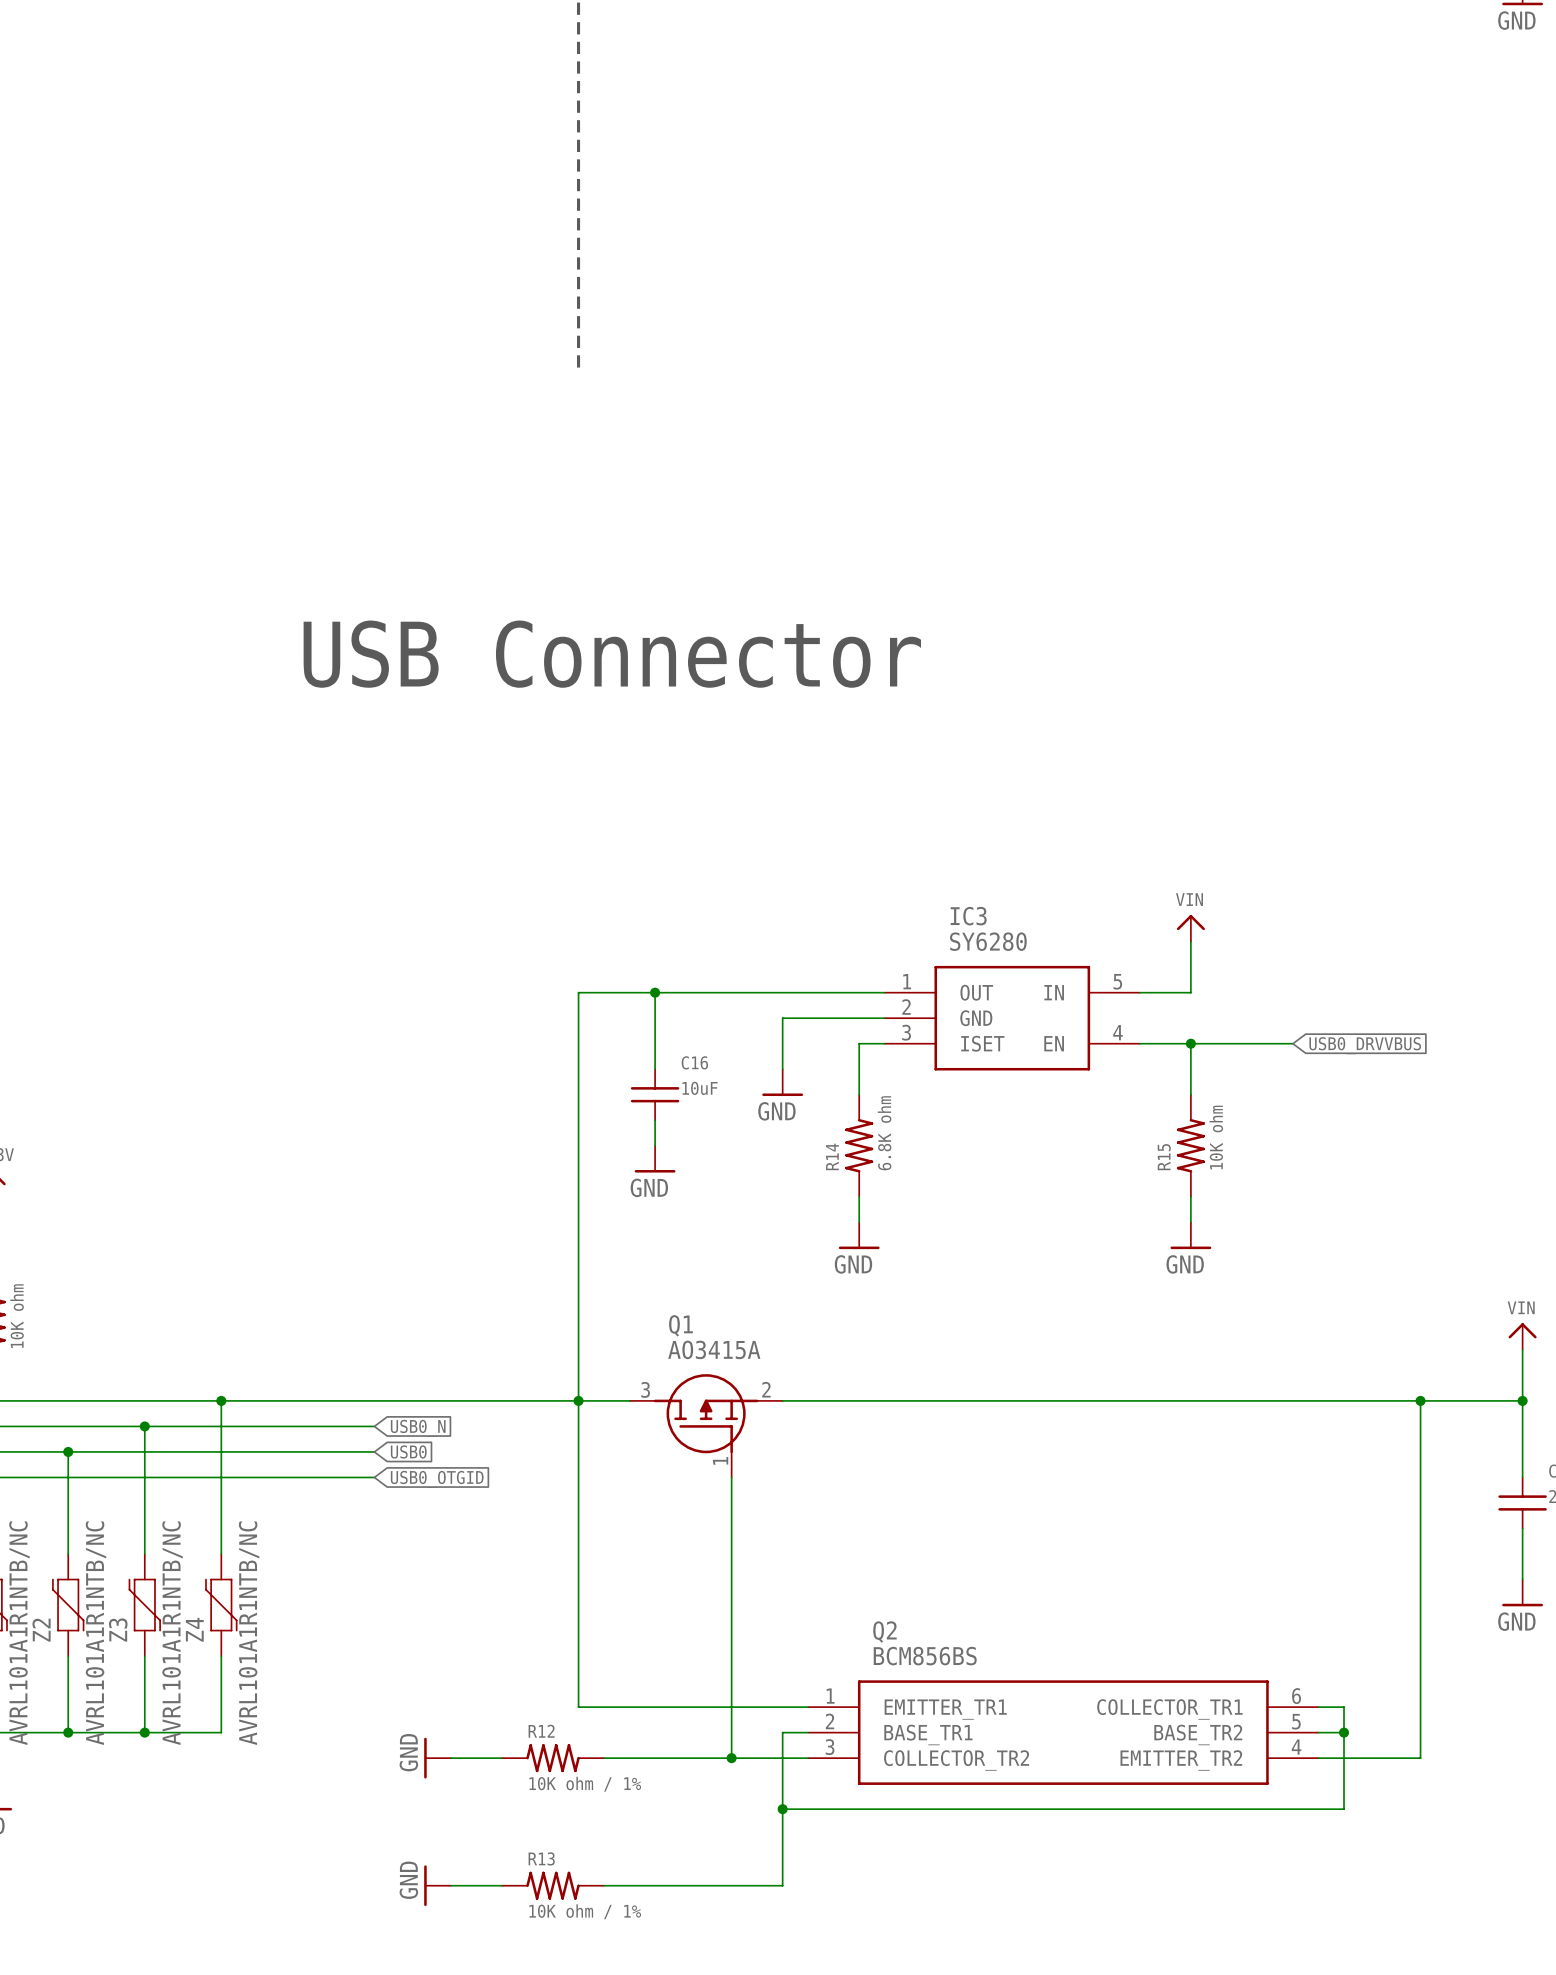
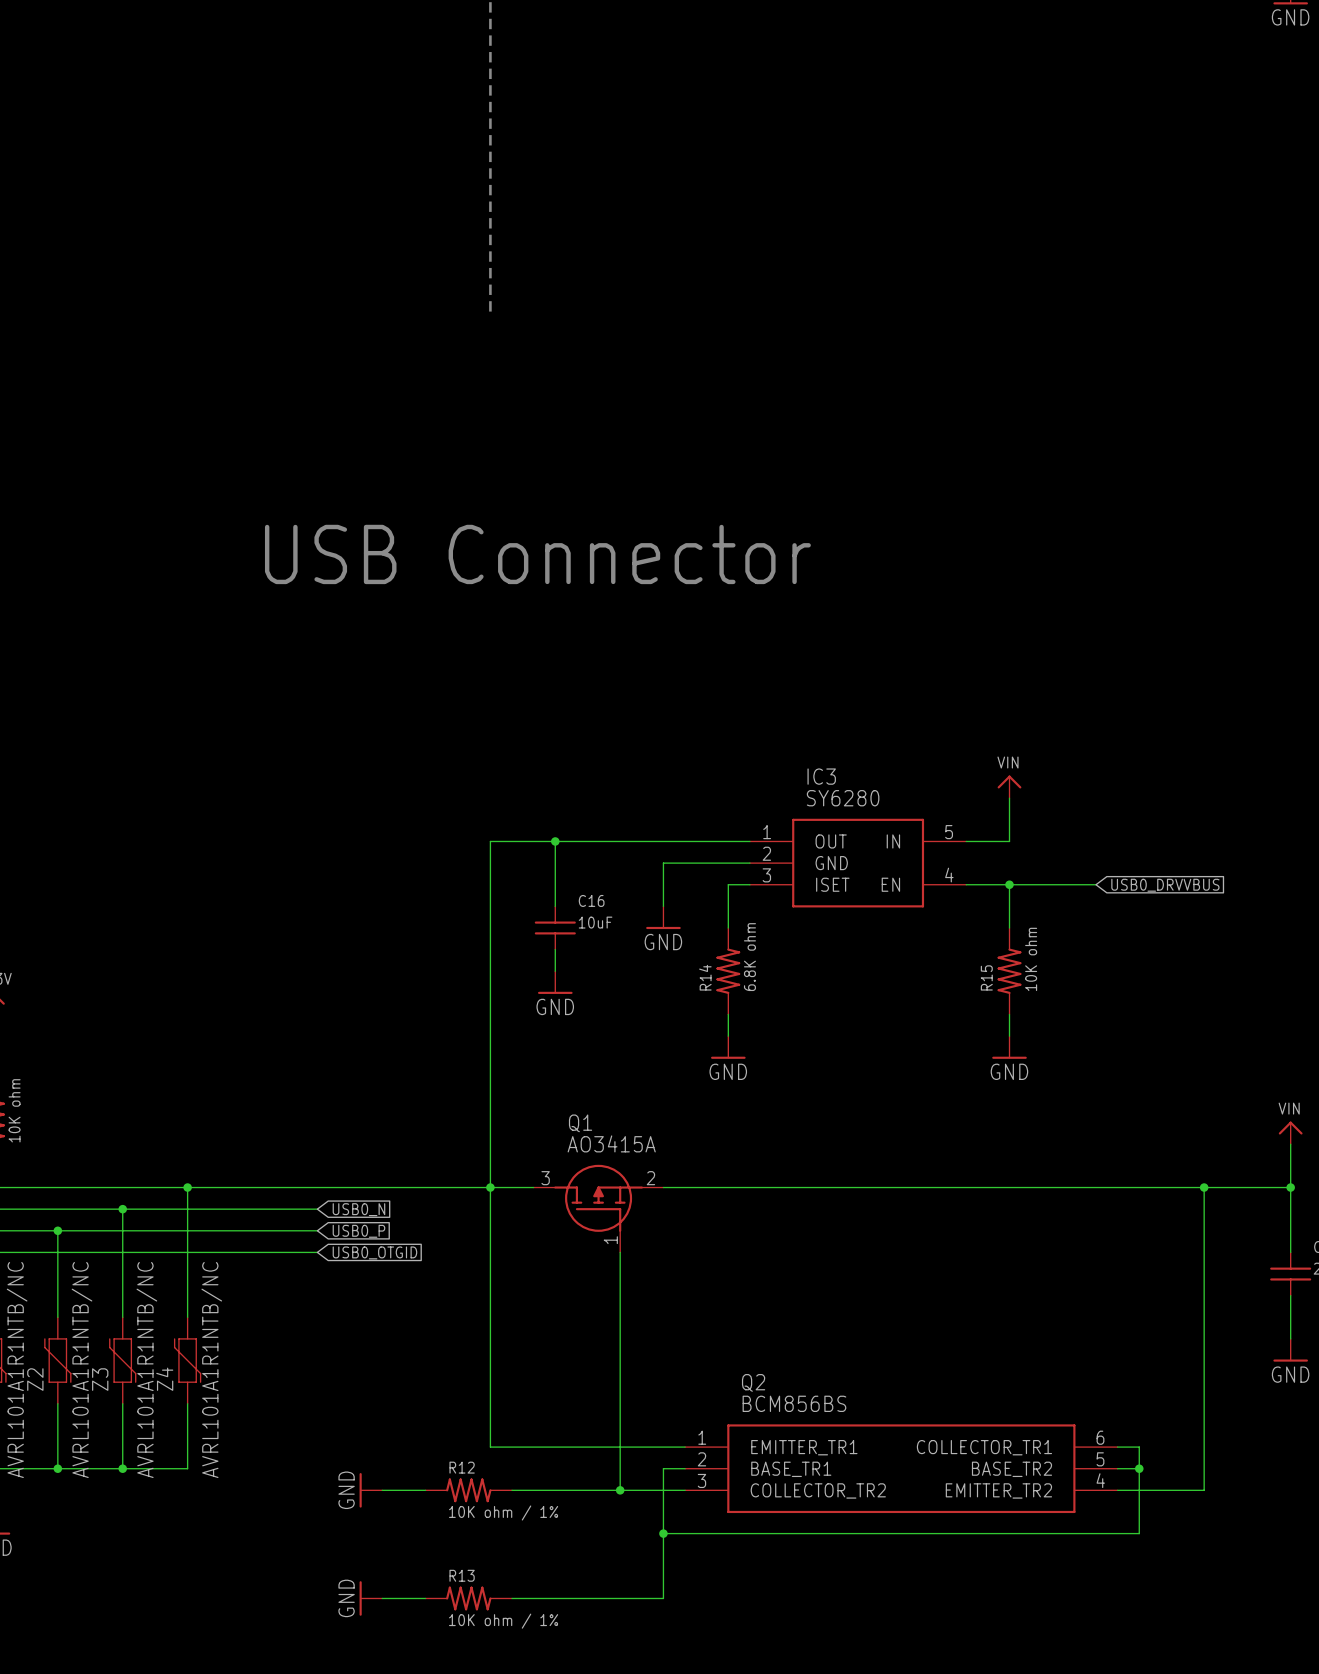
global label: USB0 (408, 1451) -> USB0_P (358, 1231)

